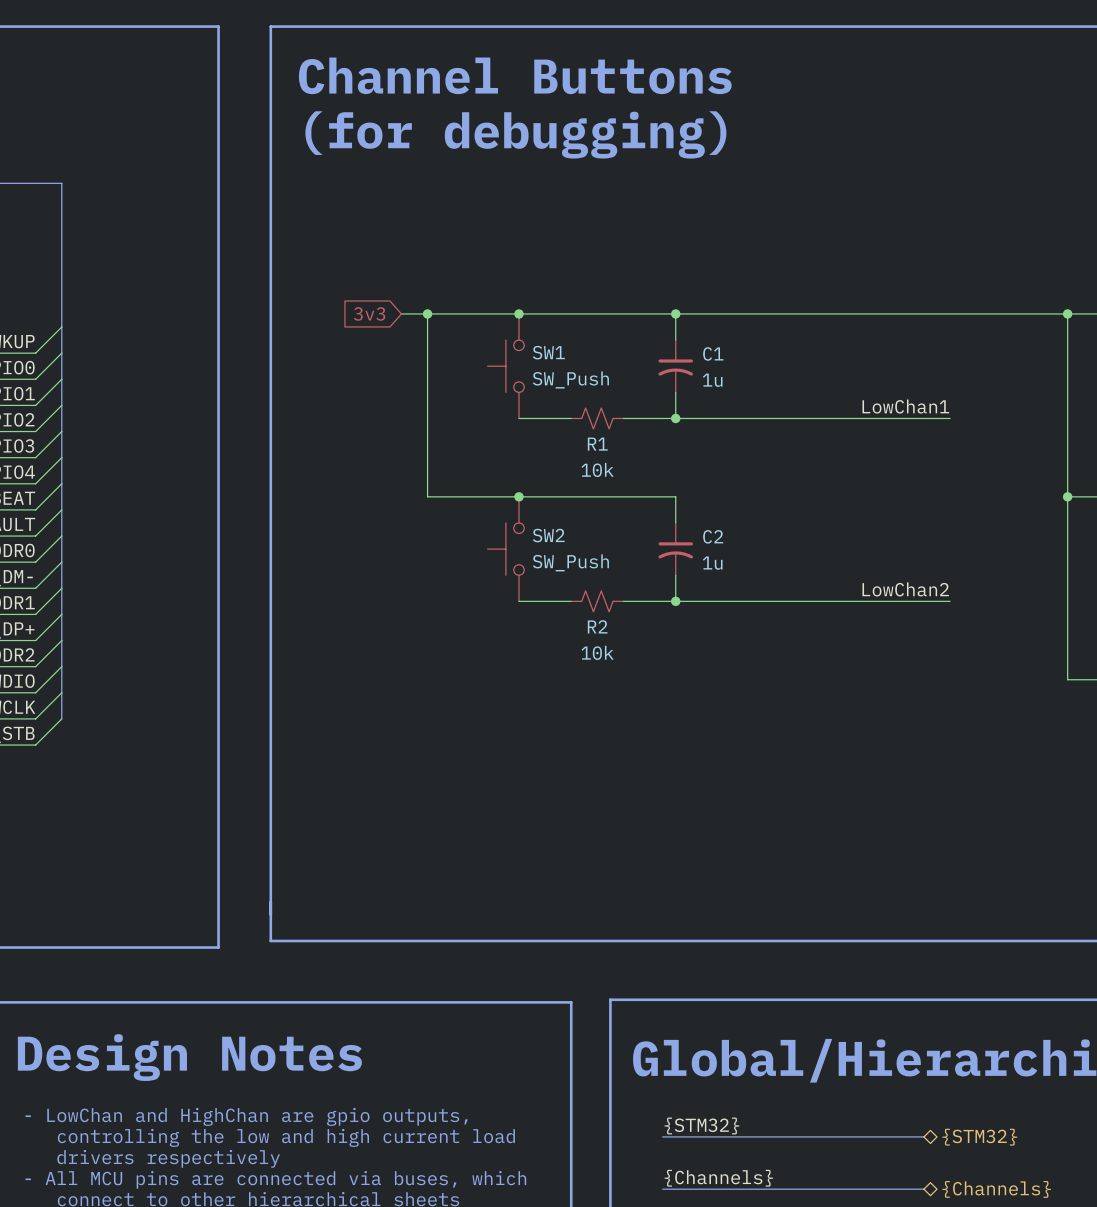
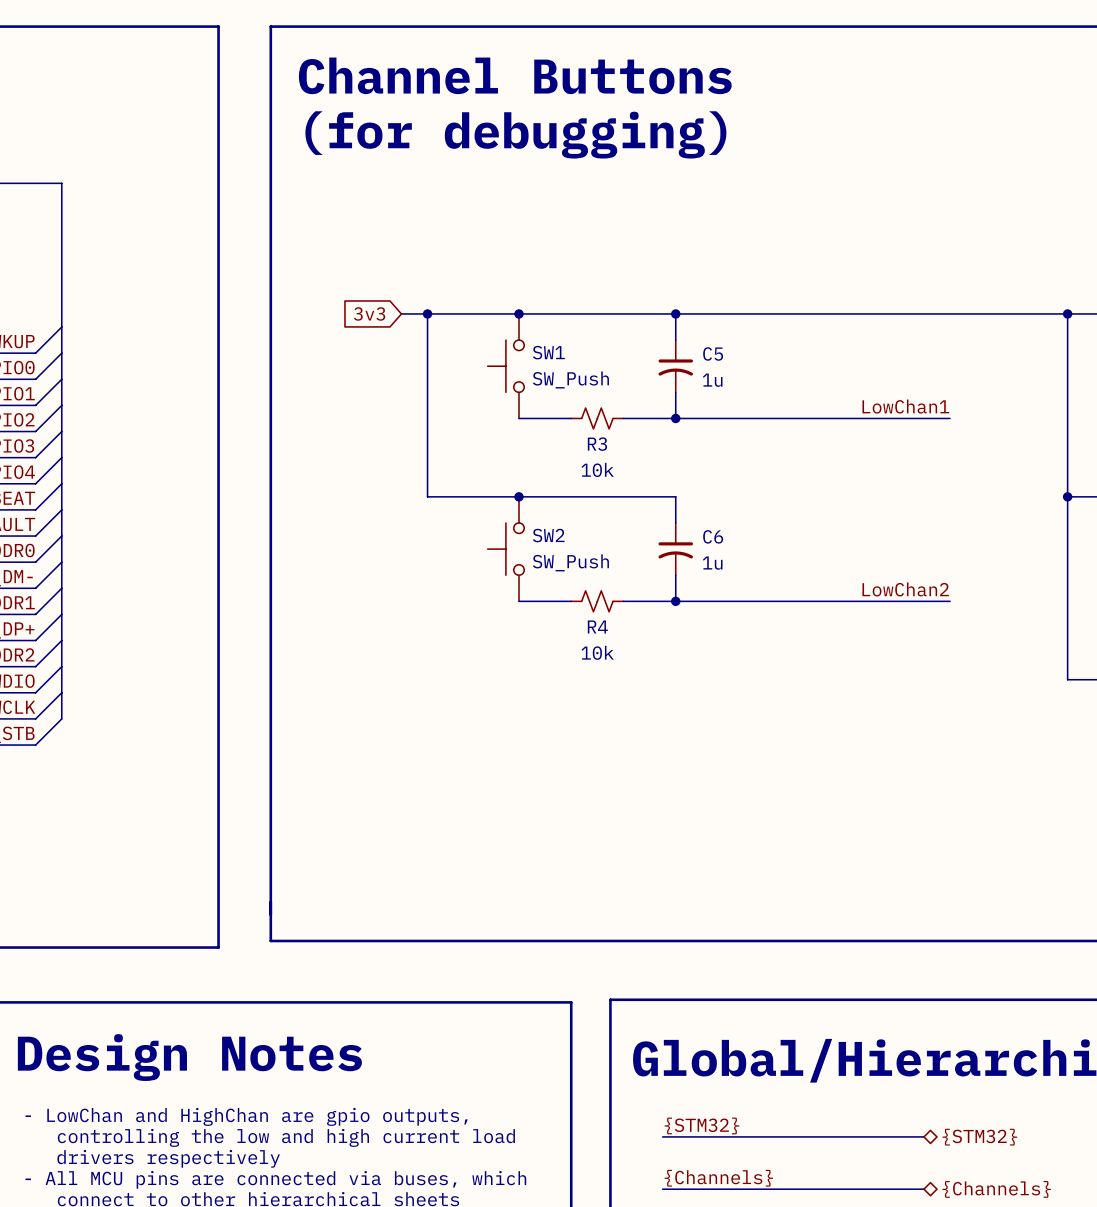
C1 name: C1 (713, 353) -> C5 (713, 353)
R1 name: R1 (597, 444) -> R3 (597, 444)
C2 name: C2 (713, 536) -> C6 (713, 536)
R2 name: R2 (597, 626) -> R4 (597, 626)

